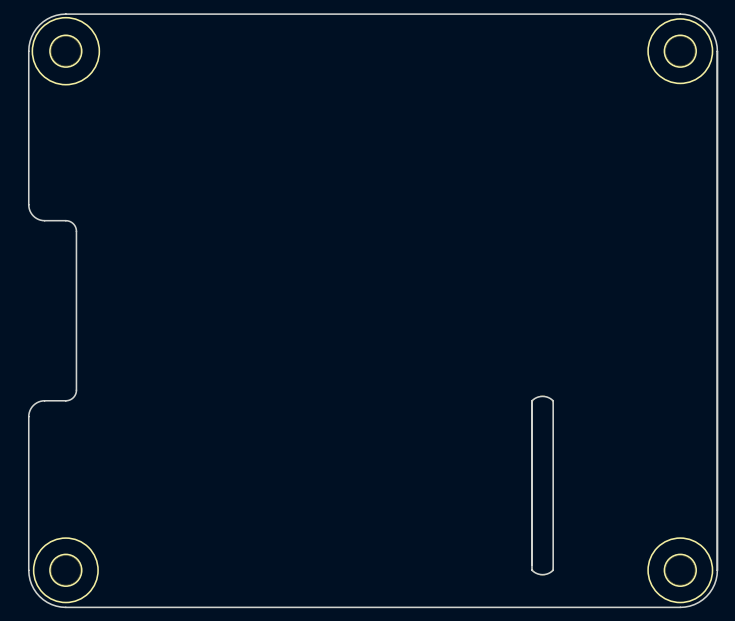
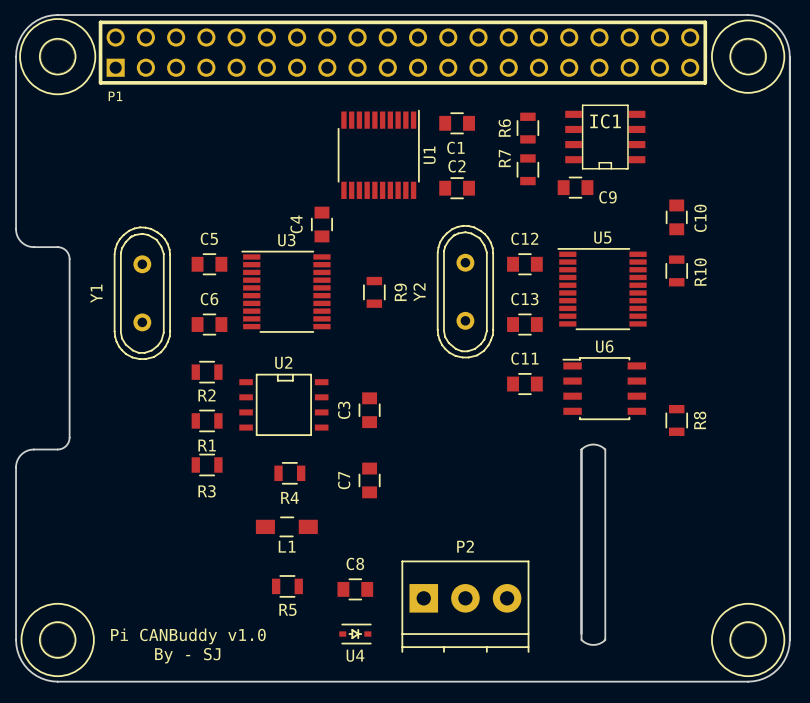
P1: none -> (402, 52)
C1: none -> (457, 123)
R6: none -> (527, 128)
IC1: none -> (605, 137)
U1: none -> (378, 154)
R7: none -> (527, 169)
C9: none -> (575, 187)
C2: none -> (457, 188)
C10: none -> (676, 217)
C4: none -> (321, 224)
C5: none -> (209, 264)
C12: none -> (524, 264)
R10: none -> (676, 270)
U5: none -> (602, 289)
U3: none -> (285, 291)
R9: none -> (374, 292)
Y2: none -> (465, 291)
Y1: none -> (142, 293)
C6: none -> (209, 324)
C13: none -> (524, 324)
R2: none -> (207, 372)
C11: none -> (524, 384)
U6: none -> (604, 388)
U2: none -> (283, 404)
C3: none -> (369, 410)
R8: none -> (676, 420)
R1: none -> (207, 420)
R3: none -> (207, 464)
R4: none -> (289, 473)
C7: none -> (369, 480)
L1: none -> (286, 526)
R5: none -> (287, 586)
C8: none -> (355, 589)
P2: none -> (465, 606)
U4: none -> (355, 634)
text: none -> Pi CANBuddy v1.0 (188, 636)
text: none -> By - SJ (187, 655)

